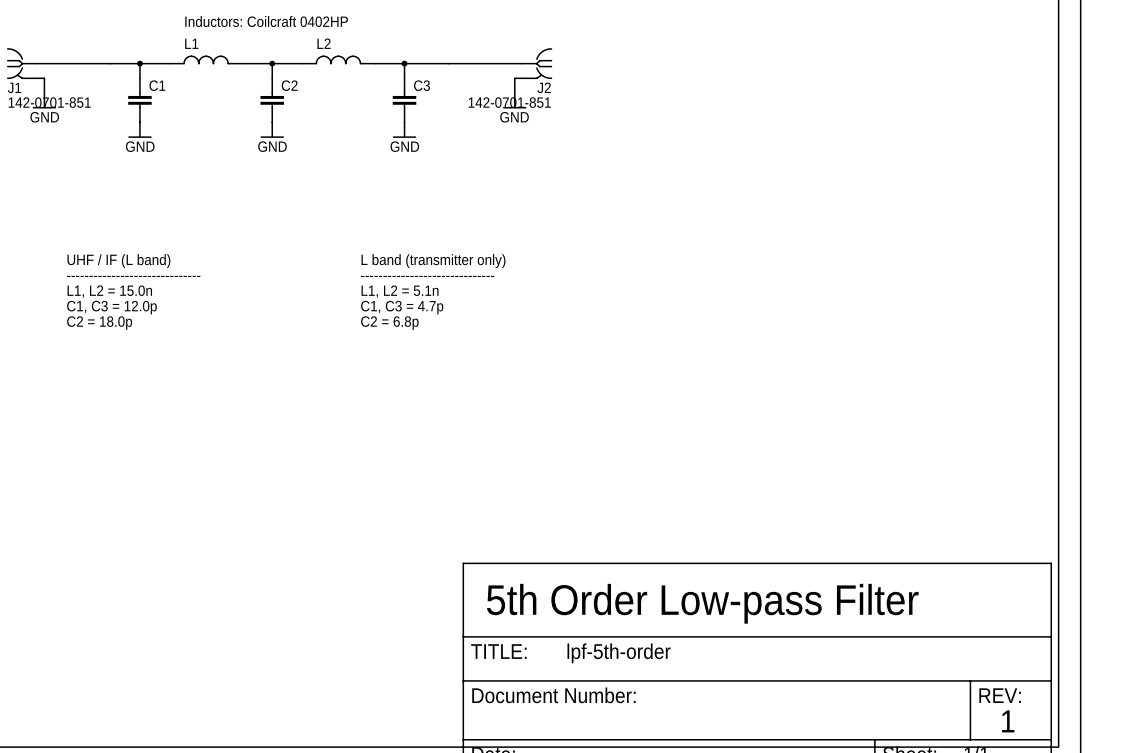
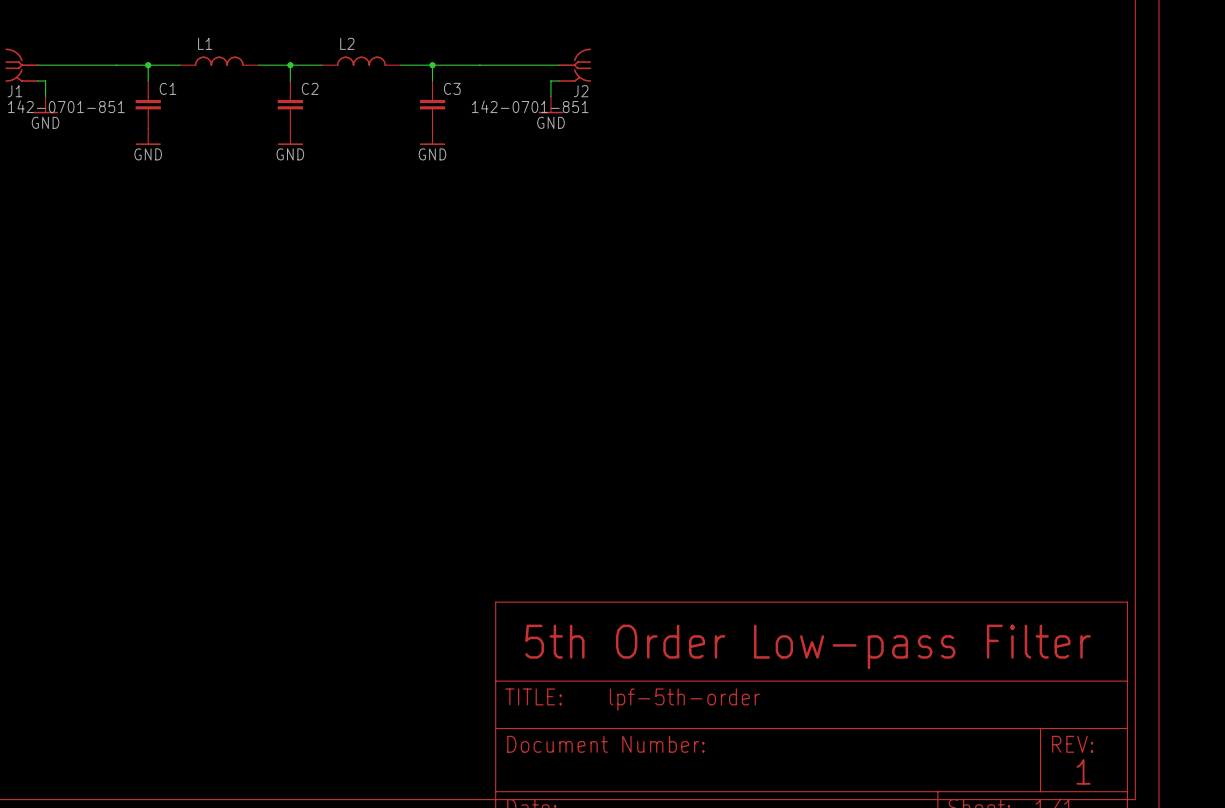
text: Inductors: Coilcraft 0402HP (266, 21) -> none
text: UHF / IF (L band) (118, 261) -> none
text: L band (transmitter only) (433, 261) -> none
text: ------------------------------ (133, 276) -> none
text: ------------------------------ (427, 276) -> none
text: L1, L2 = 15.0n (109, 291) -> none
text: L1, L2 = 5.1n (400, 291) -> none
text: C1, C3 = 12.0p (111, 307) -> none
text: C1, C3 = 4.7p (402, 307) -> none
text: C2 = 18.0p (99, 323) -> none
text: C2 = 6.8p (389, 323) -> none

